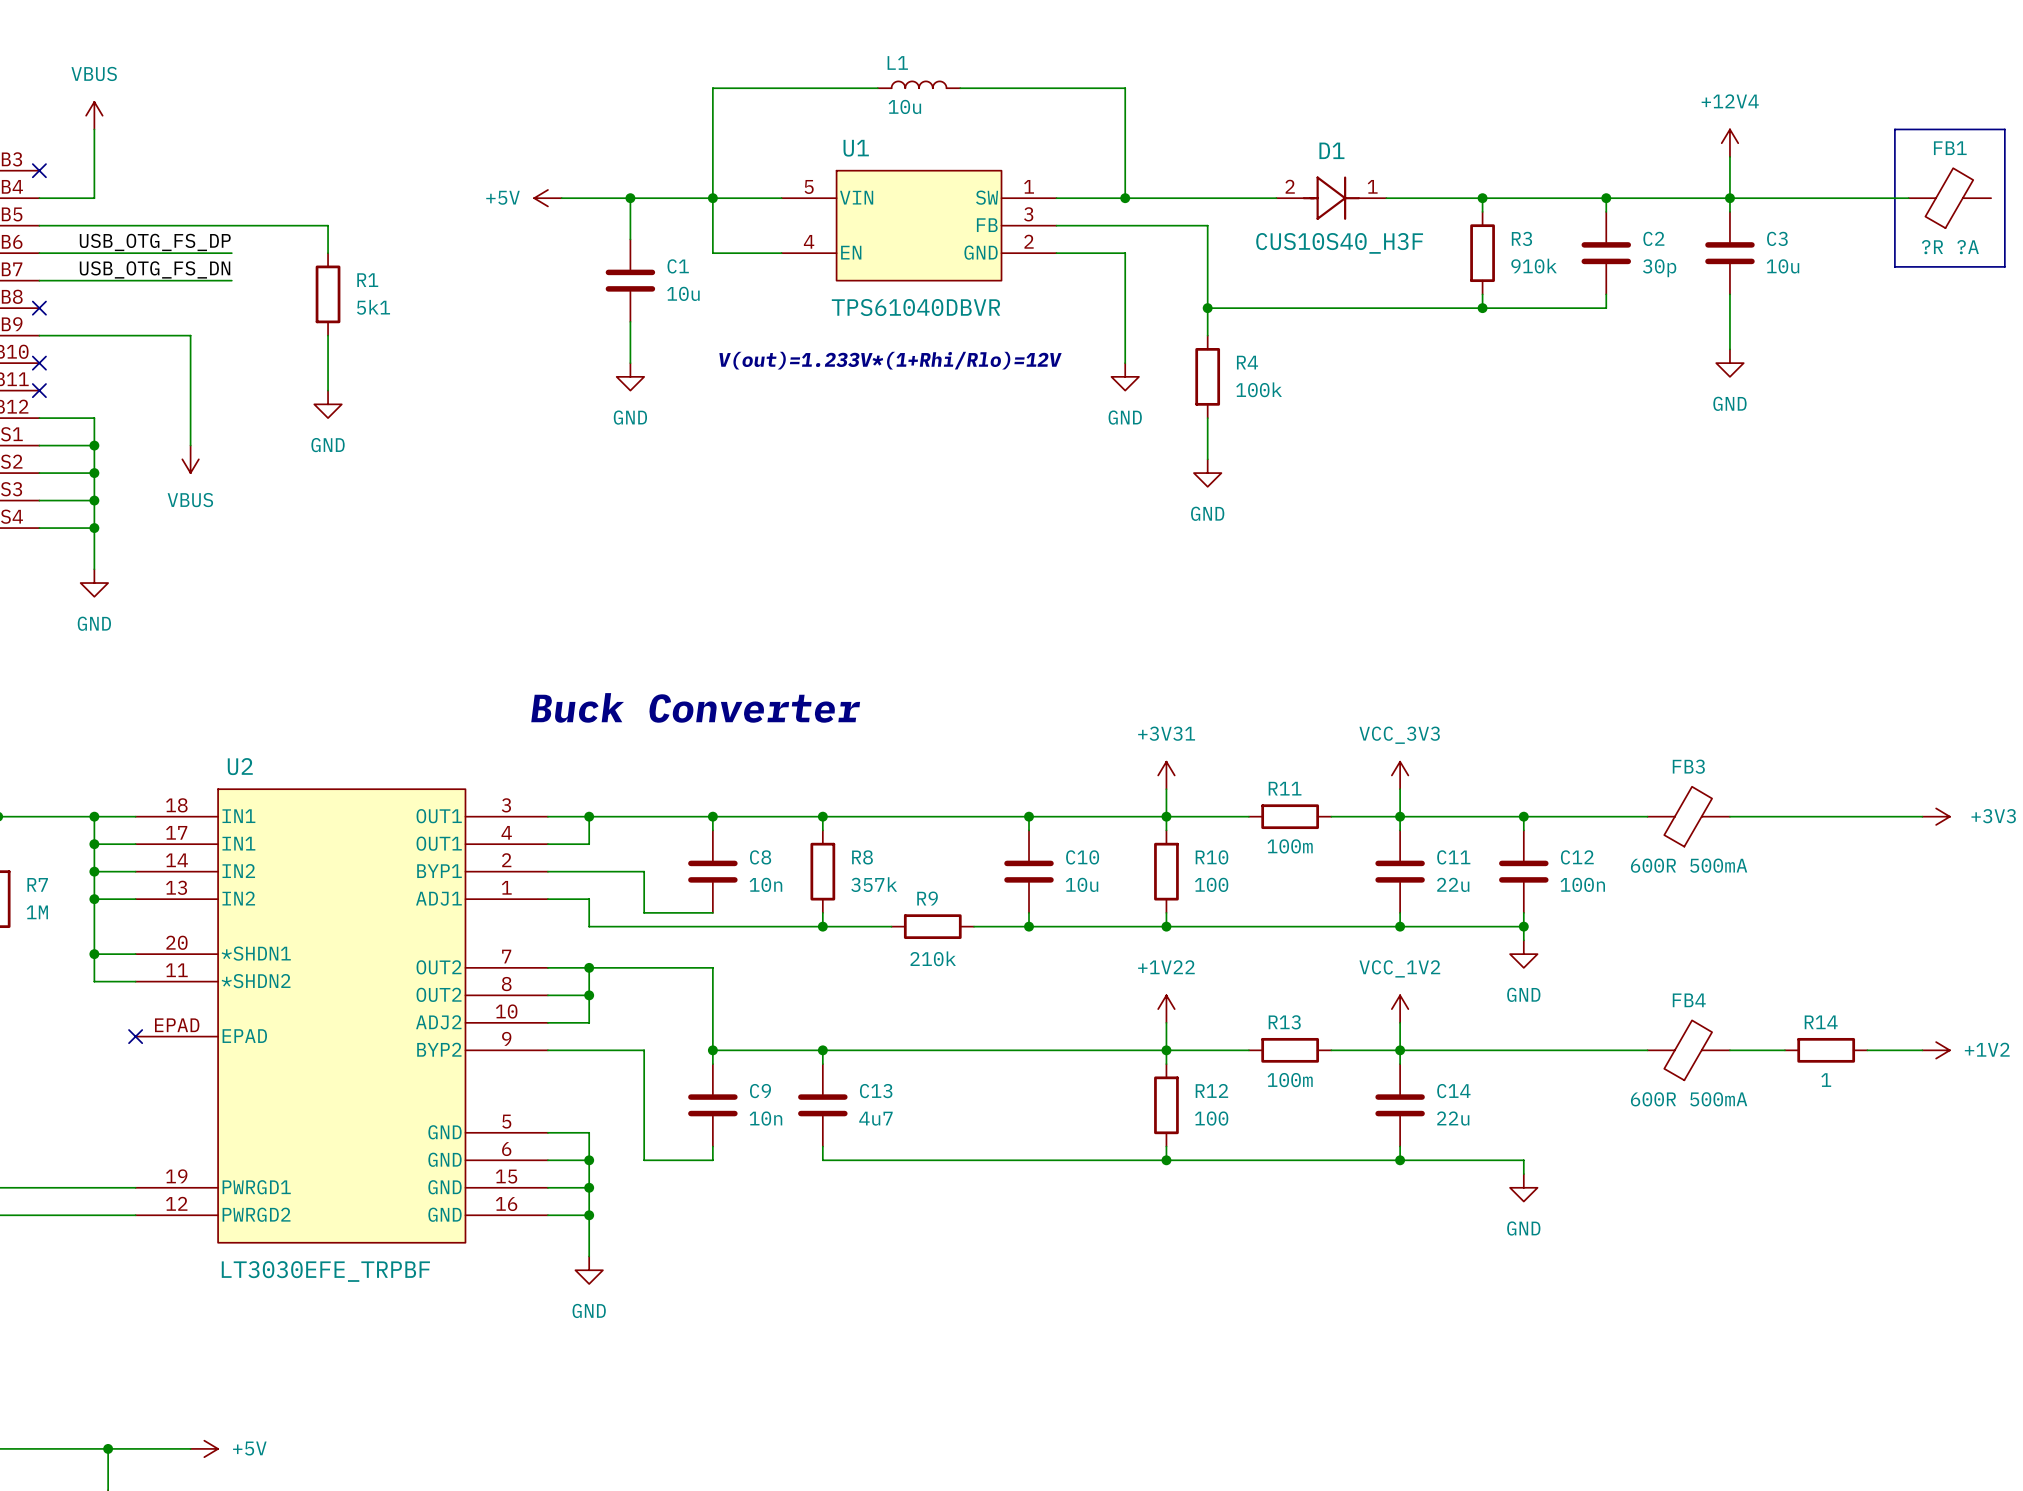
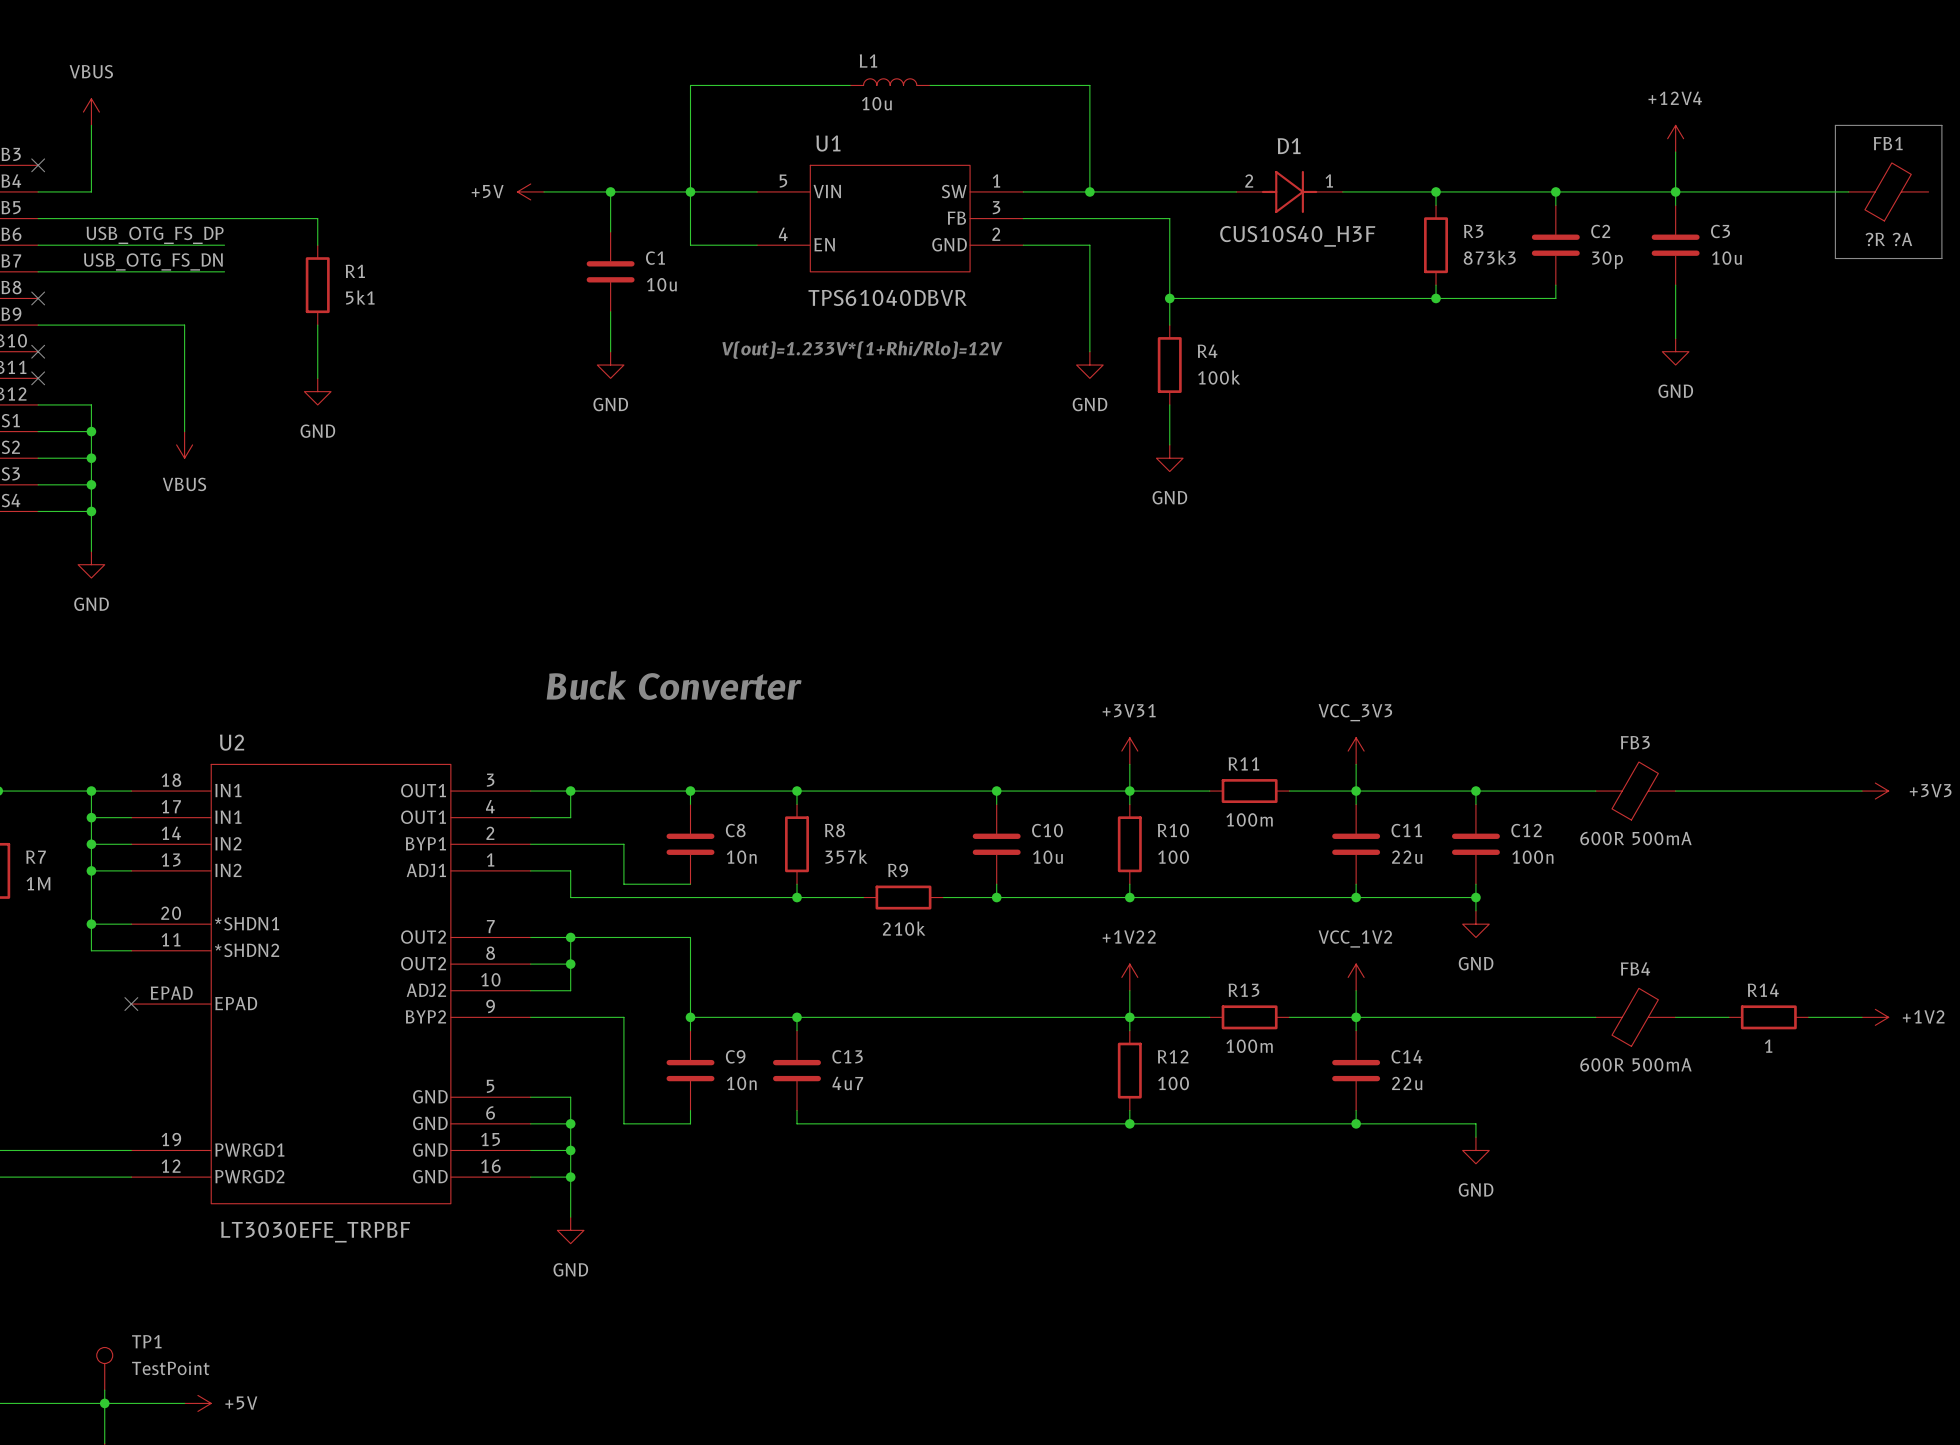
R3 value: 910k (1534, 266) -> 873k3 (1489, 257)
TP1: none -> TestPoint (104, 1368)
wire: none -> (104, 1390) (104, 1403)

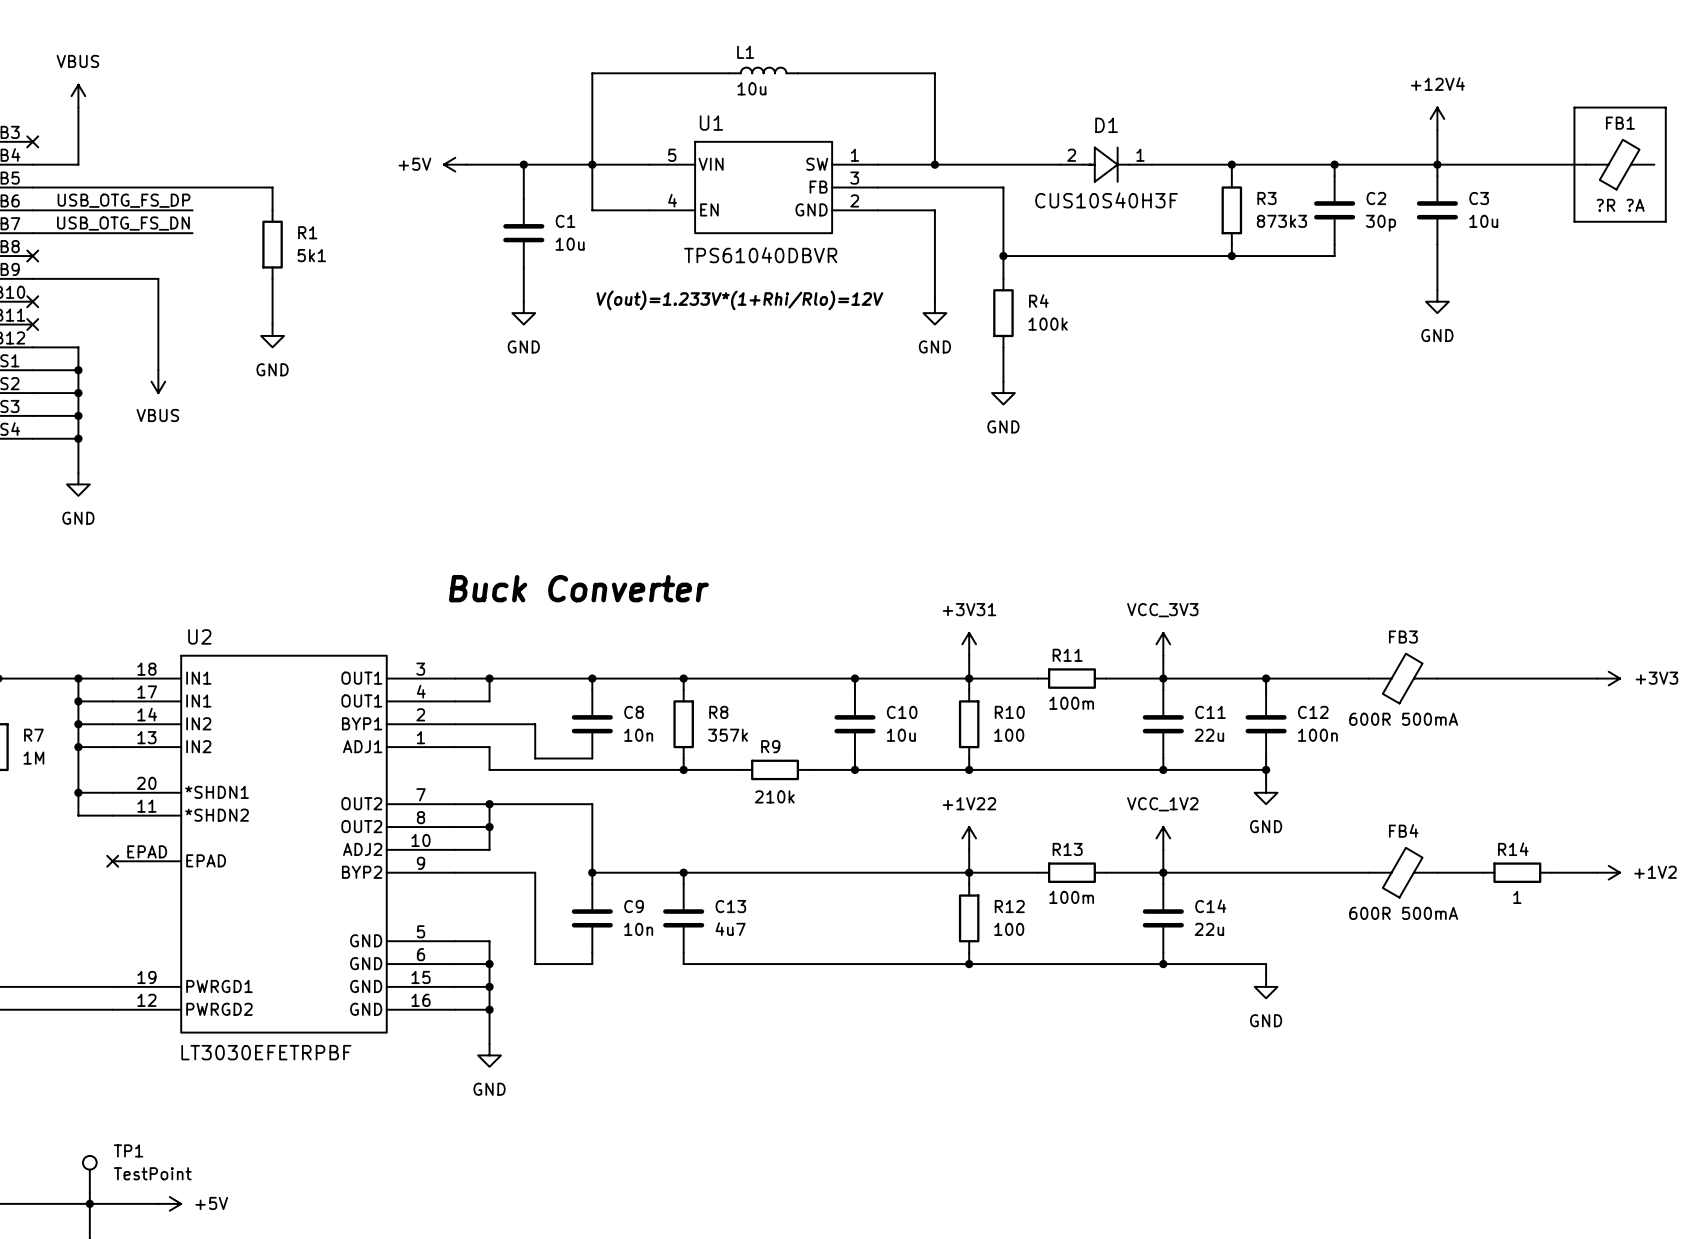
D1 value: CUS10S40_H3F (1297, 236) -> CUS10S40H3F (1106, 200)
U2 value: LT3030EFE_TRPBF (315, 1232) -> LT3030EFETRPBF (266, 1052)

